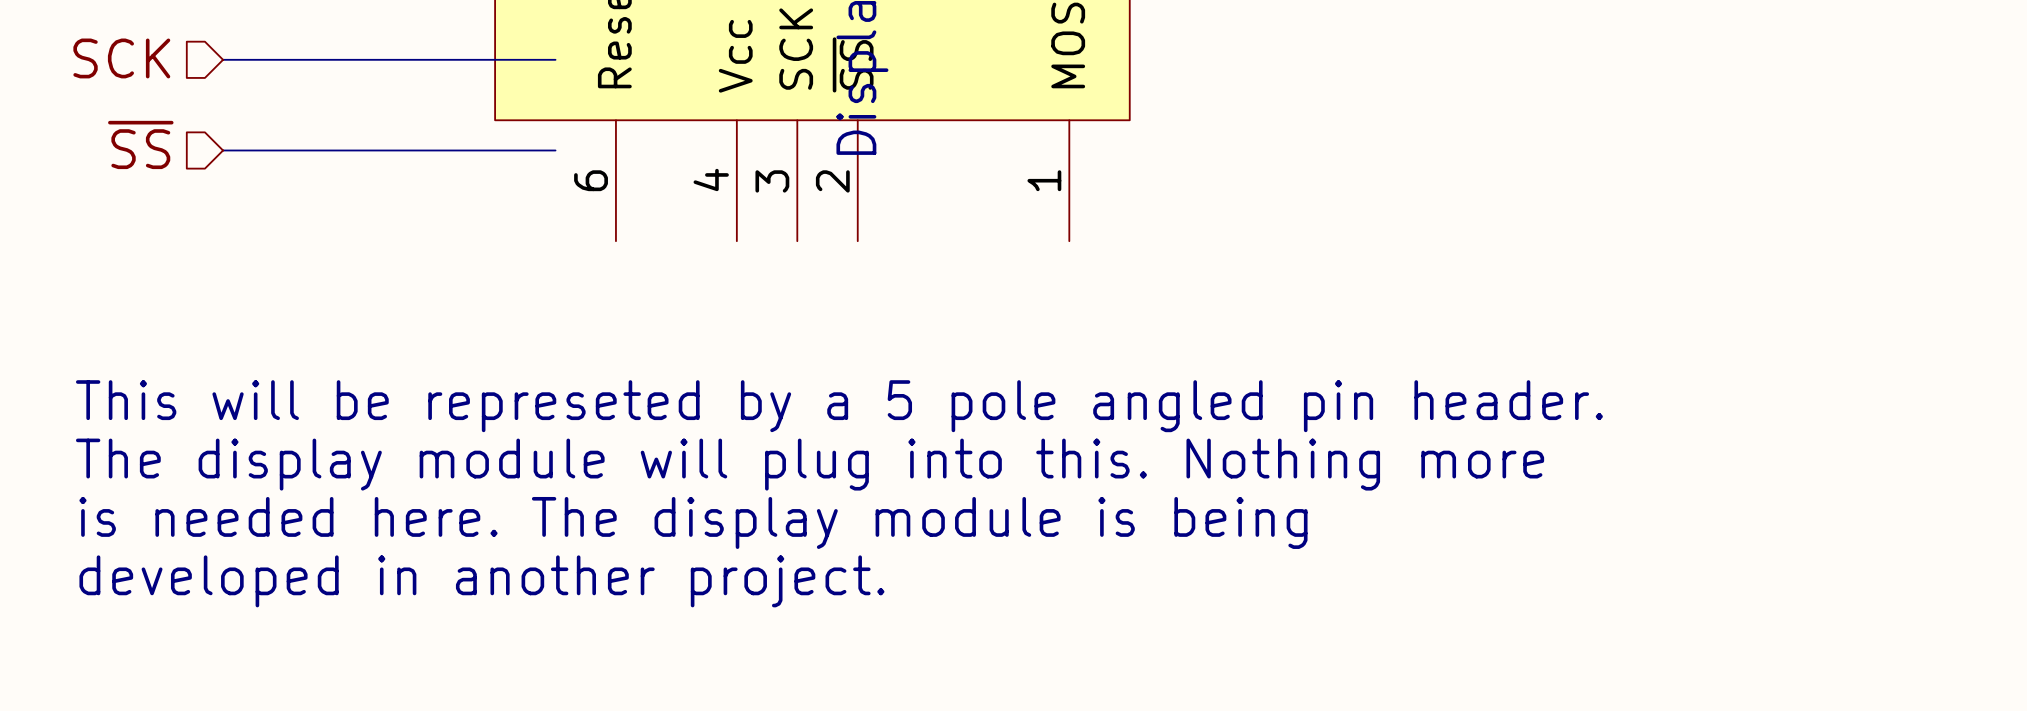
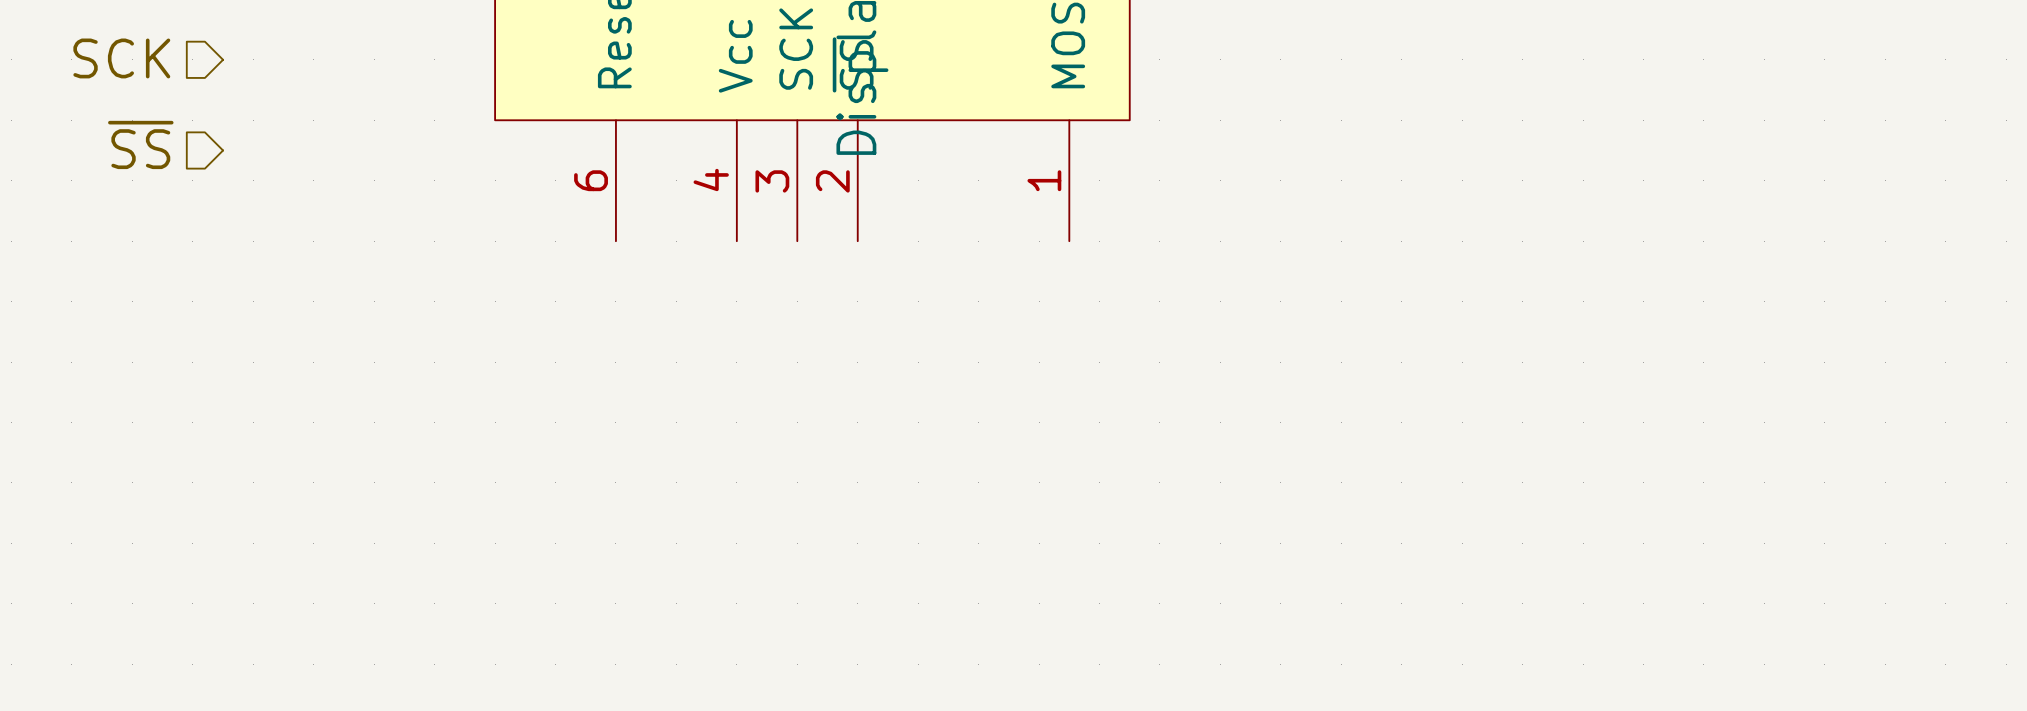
wire: (223, 59) (555, 59) -> none
wire: (223, 150) (555, 150) -> none
text: This will be represeted by a 5 pole angled pin header. (839, 406) -> none
text: The display module will plug into this. Nothing more (810, 464) -> none
text: is needed here. The display module is being (693, 522) -> none
text: developed in another project. (481, 581) -> none

